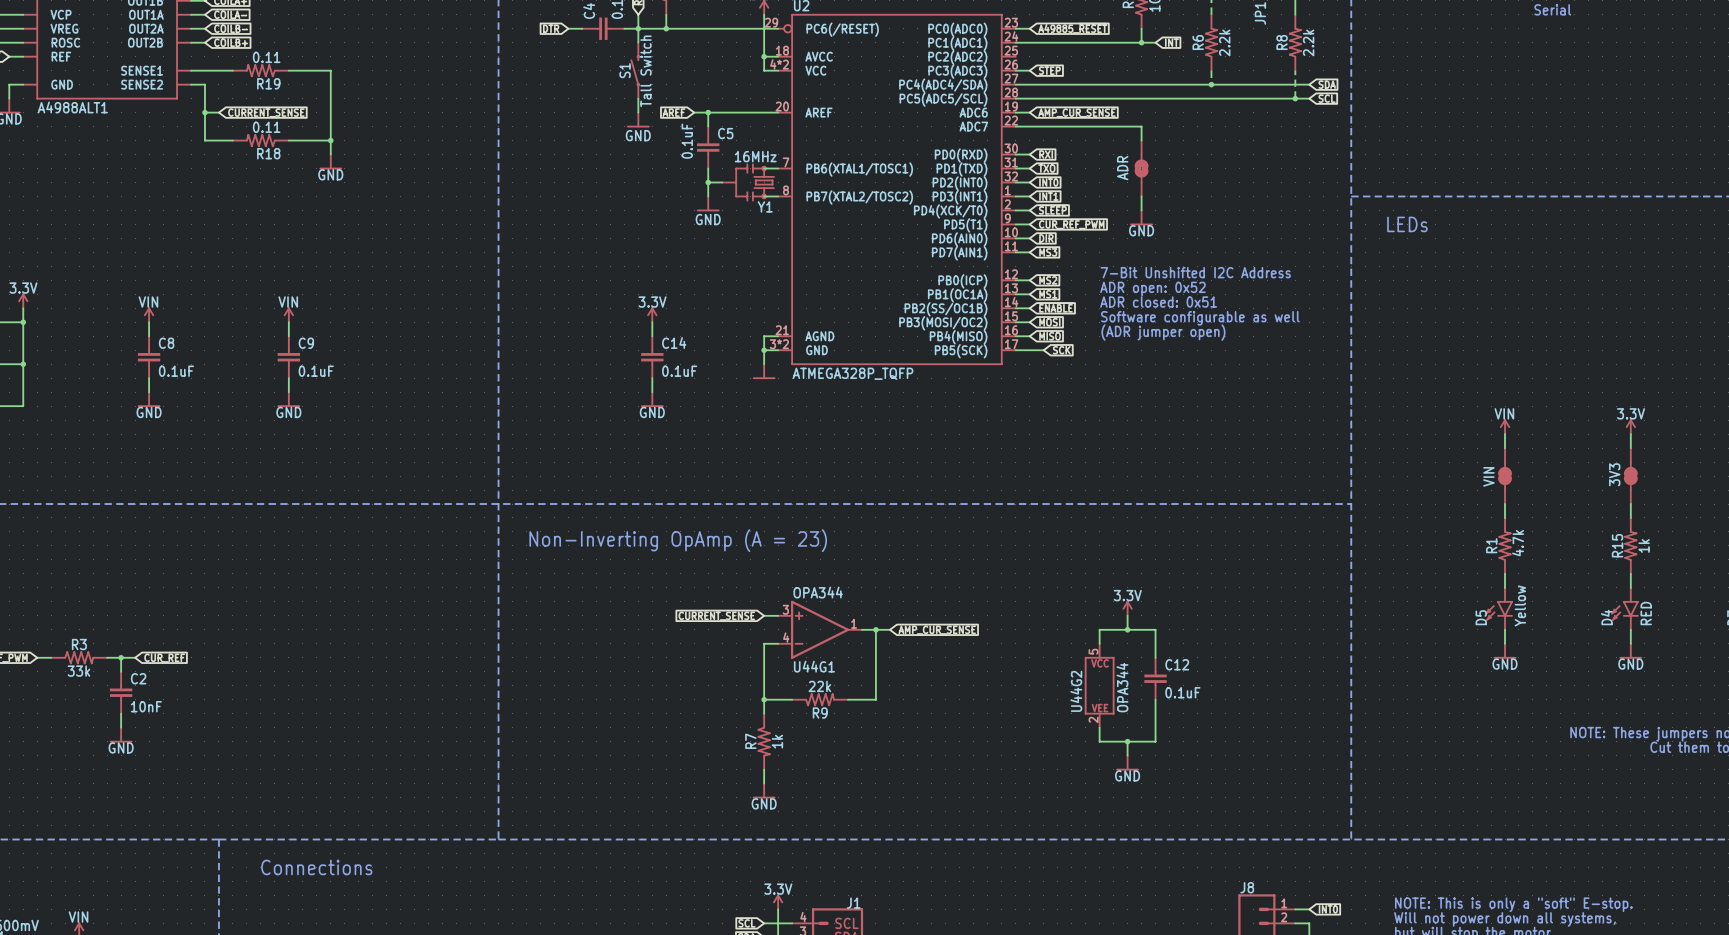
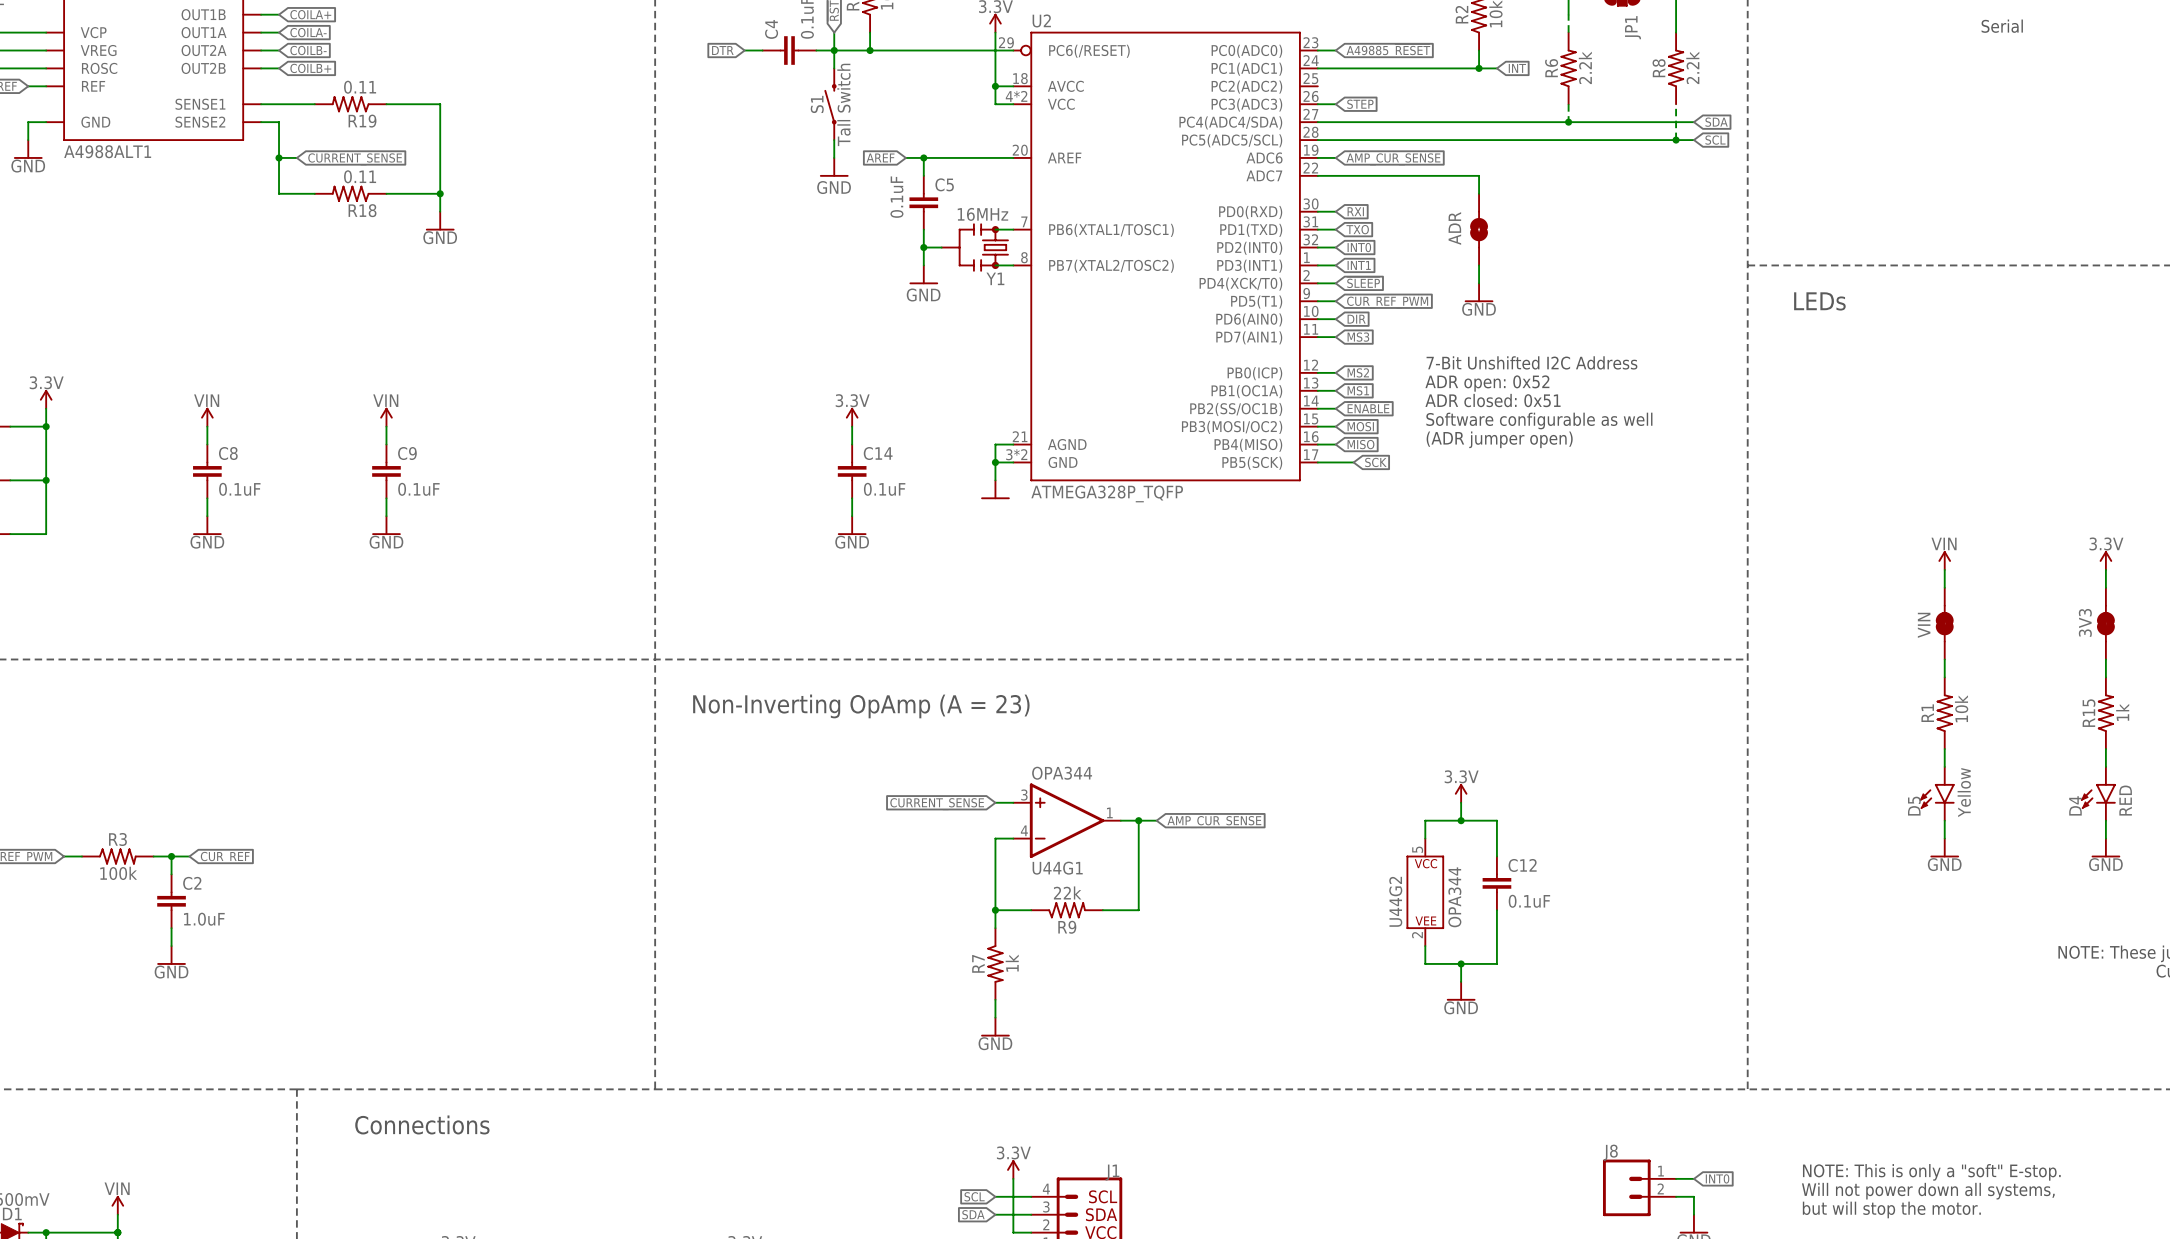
R1 value: 4.7k (1518, 543) -> 10k (1961, 708)
R3 value: 33k (78, 671) -> 100k (118, 873)
C2 value: 10nF (146, 706) -> 1.0uF (204, 919)

